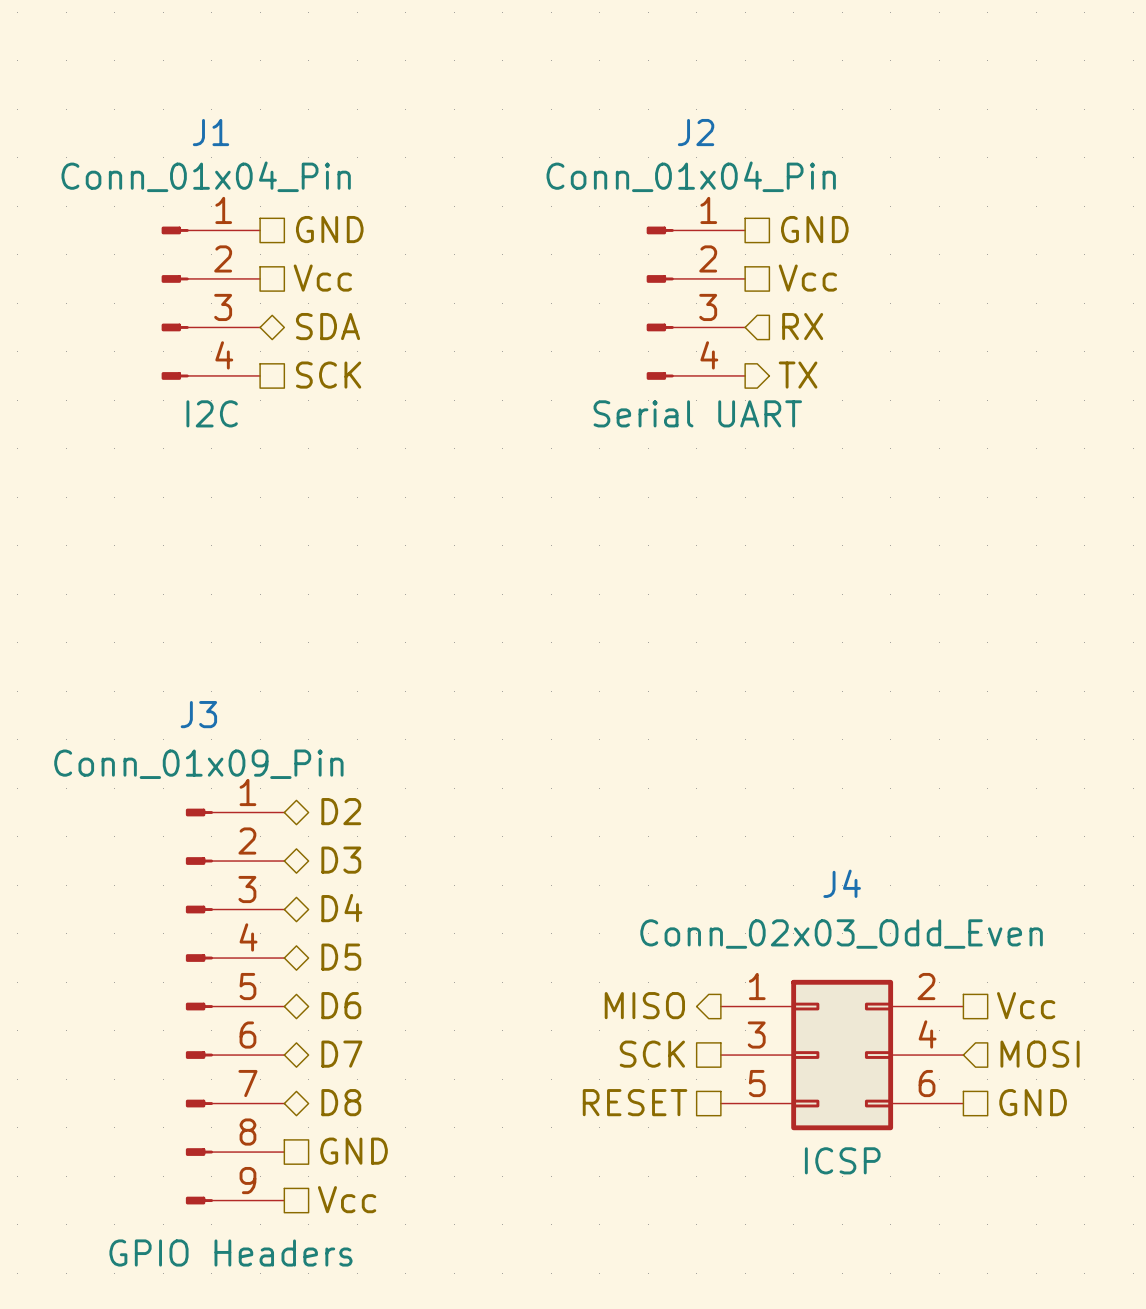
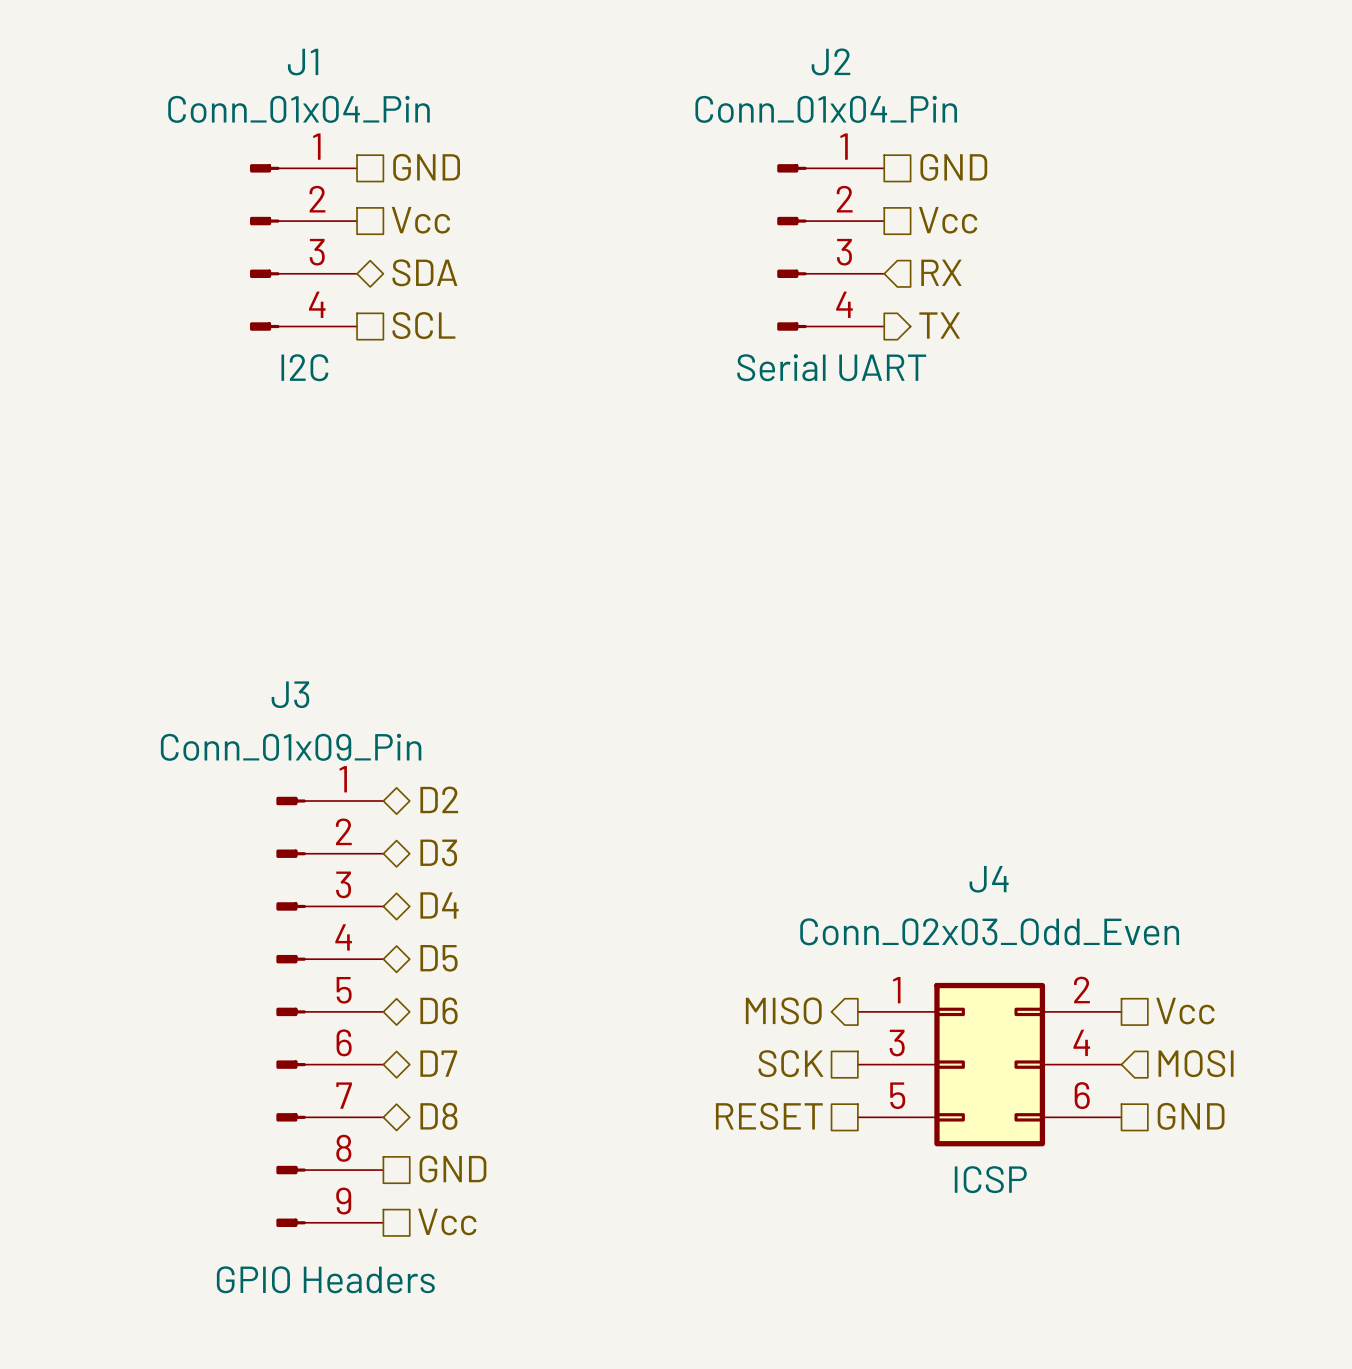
hierarchical label: SCK (328, 375) -> SCL (423, 325)

